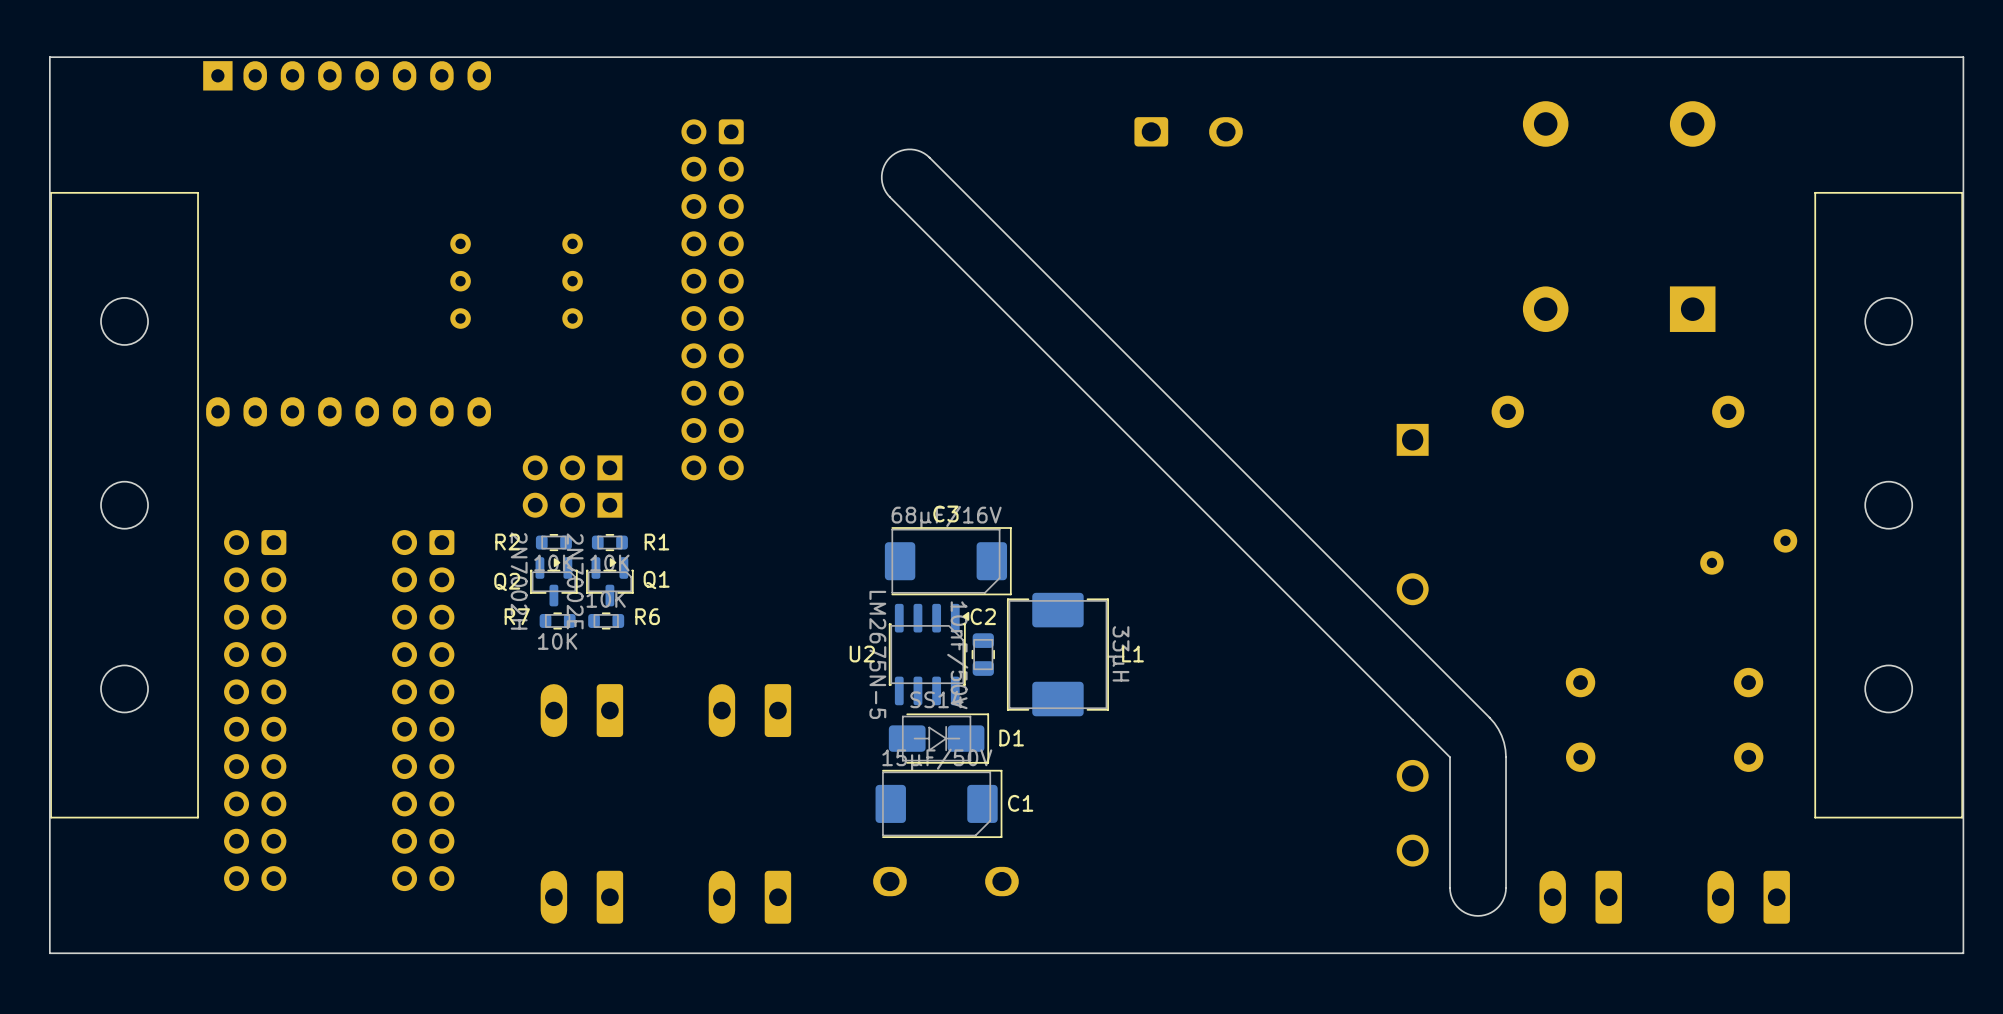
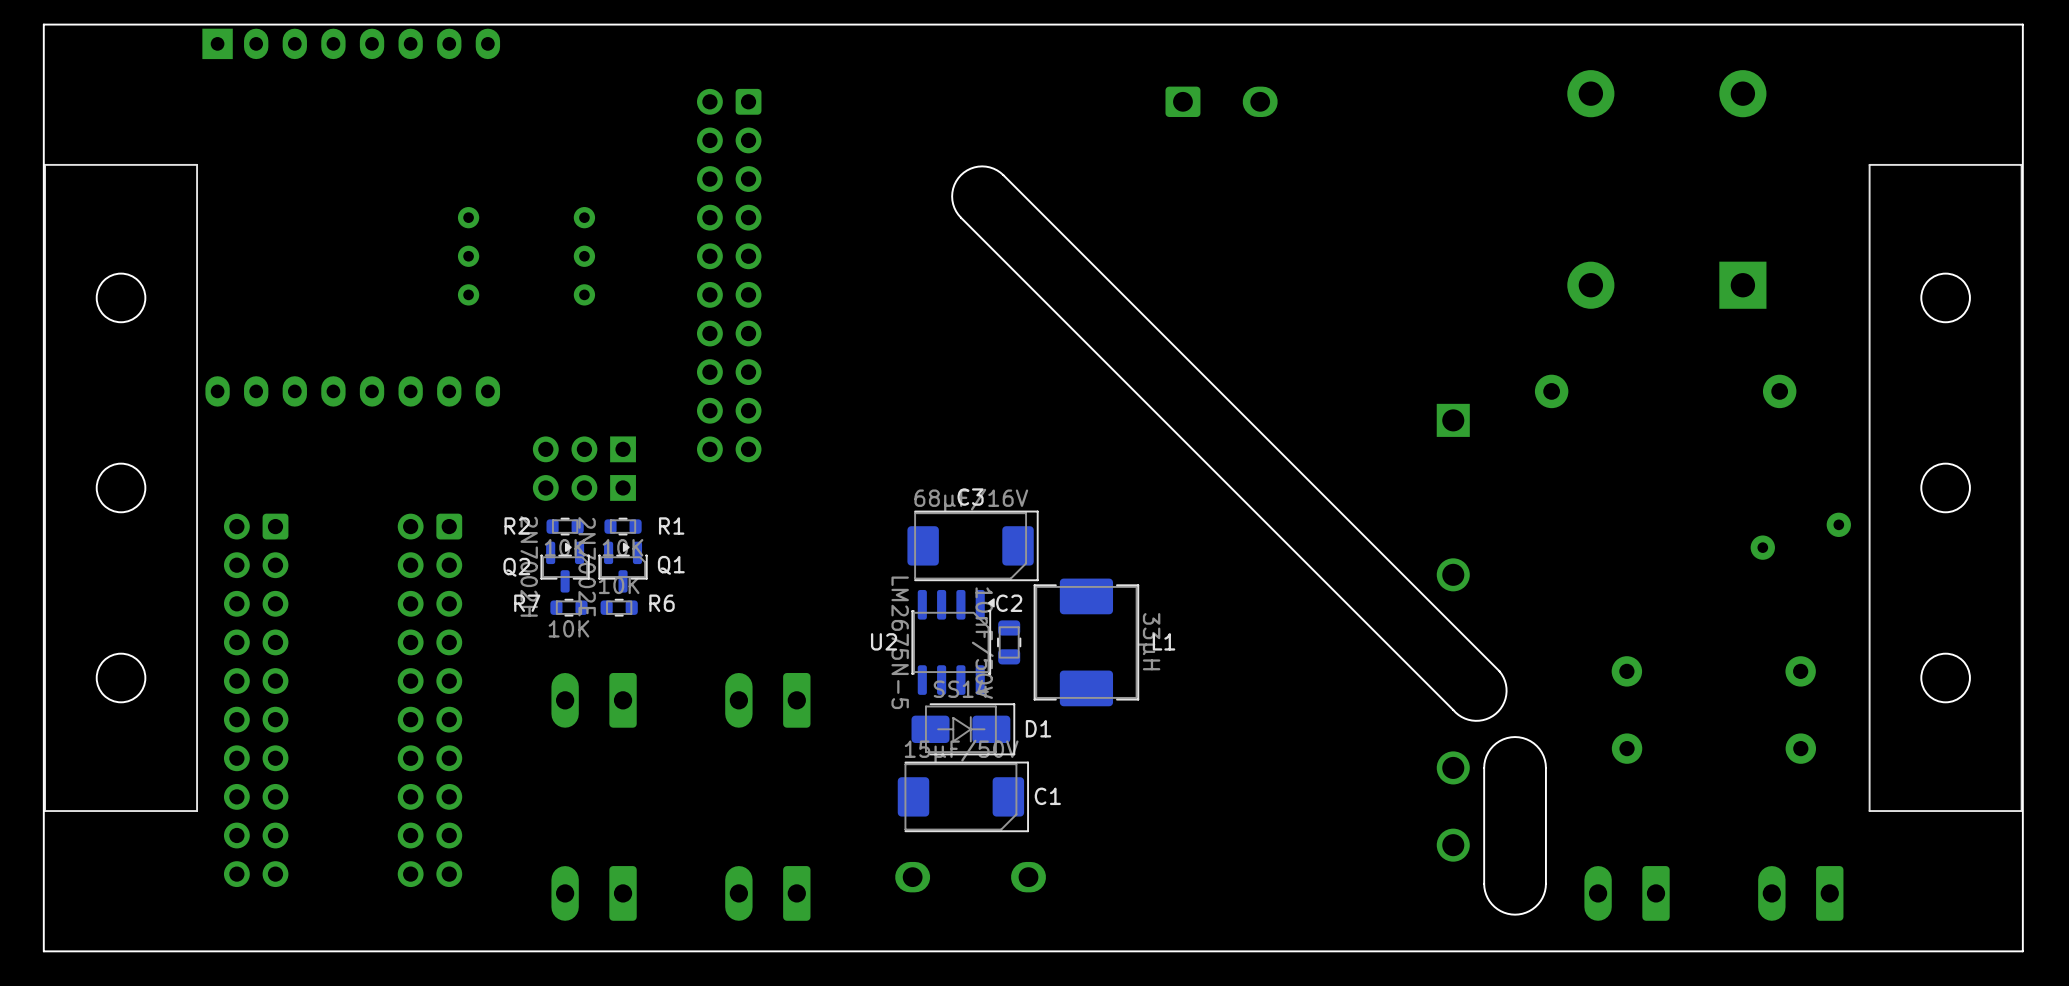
board edge: (936, 243) (889, 197) (884, 188) (881, 175) (884, 165) (889, 157) (898, 151) (914, 149) (929, 157) (1494, 723) (1501, 735) (1505, 749) (1506, 887) (1501, 903) (1487, 914) (1478, 915) (1468, 914) (1457, 906) (1451, 897) (1450, 887) (1450, 757) (1412, 719) -> (960, 217) (954, 207) (952, 196) (954, 184) (960, 175) (967, 170) (978, 166) (989, 167) (1000, 172) (1499, 671) (1504, 680) (1506, 691) (1504, 702) (1495, 713) (1486, 719) (1471, 720) (1461, 716) (1453, 710)
board edge: none -> (1545, 767) (1545, 891) (1540, 901) (1529, 911) (1518, 914) (1507, 913) (1491, 904) (1484, 887) (1485, 759) (1488, 752) (1496, 743) (1507, 738) (1519, 737) (1530, 741) (1539, 749) (1543, 756) (1545, 767)

